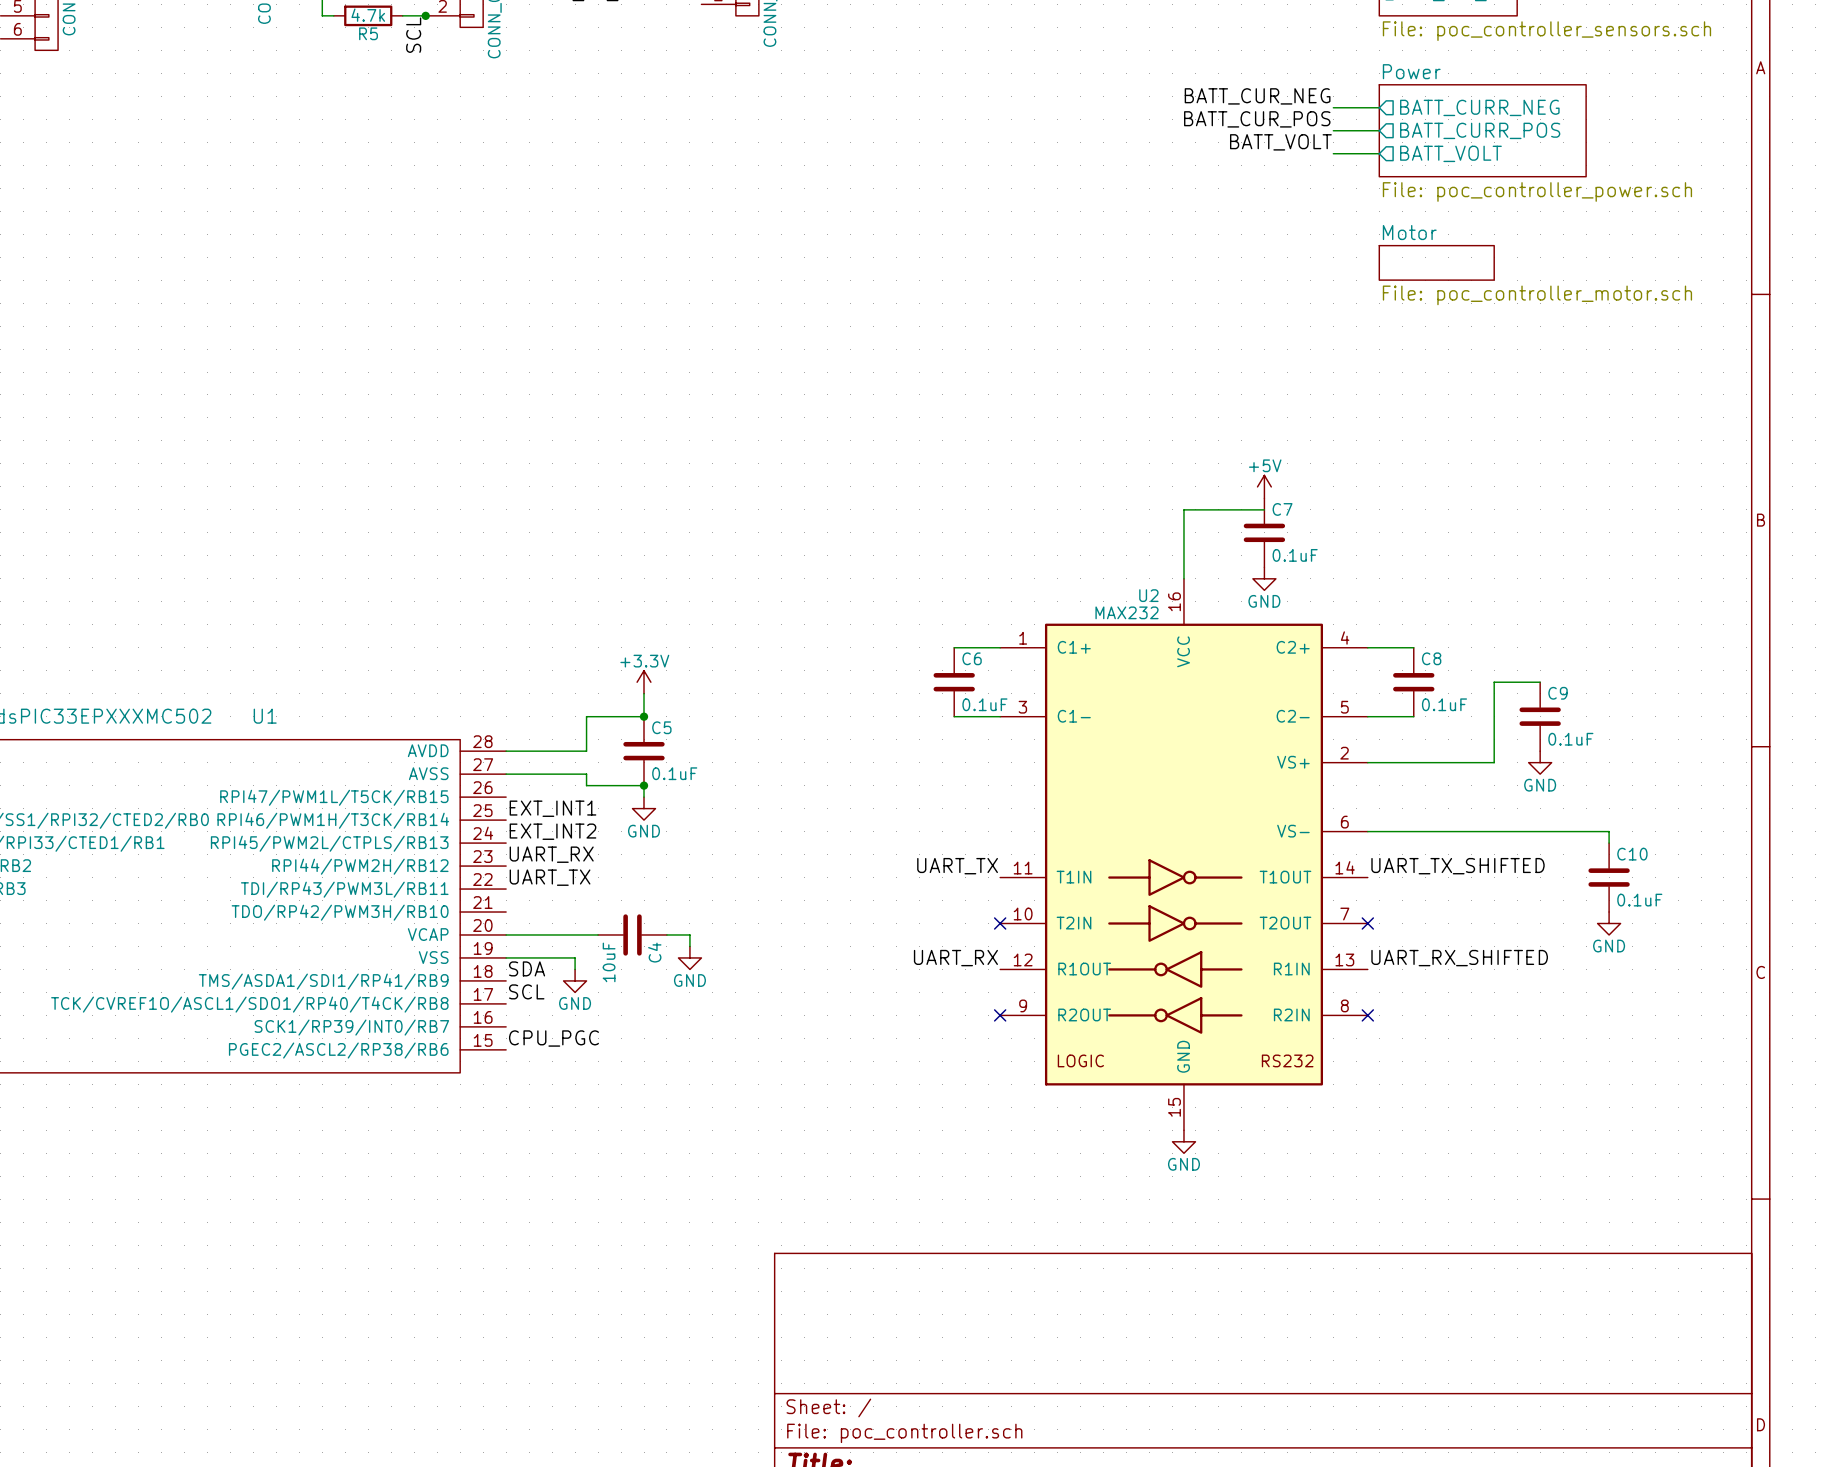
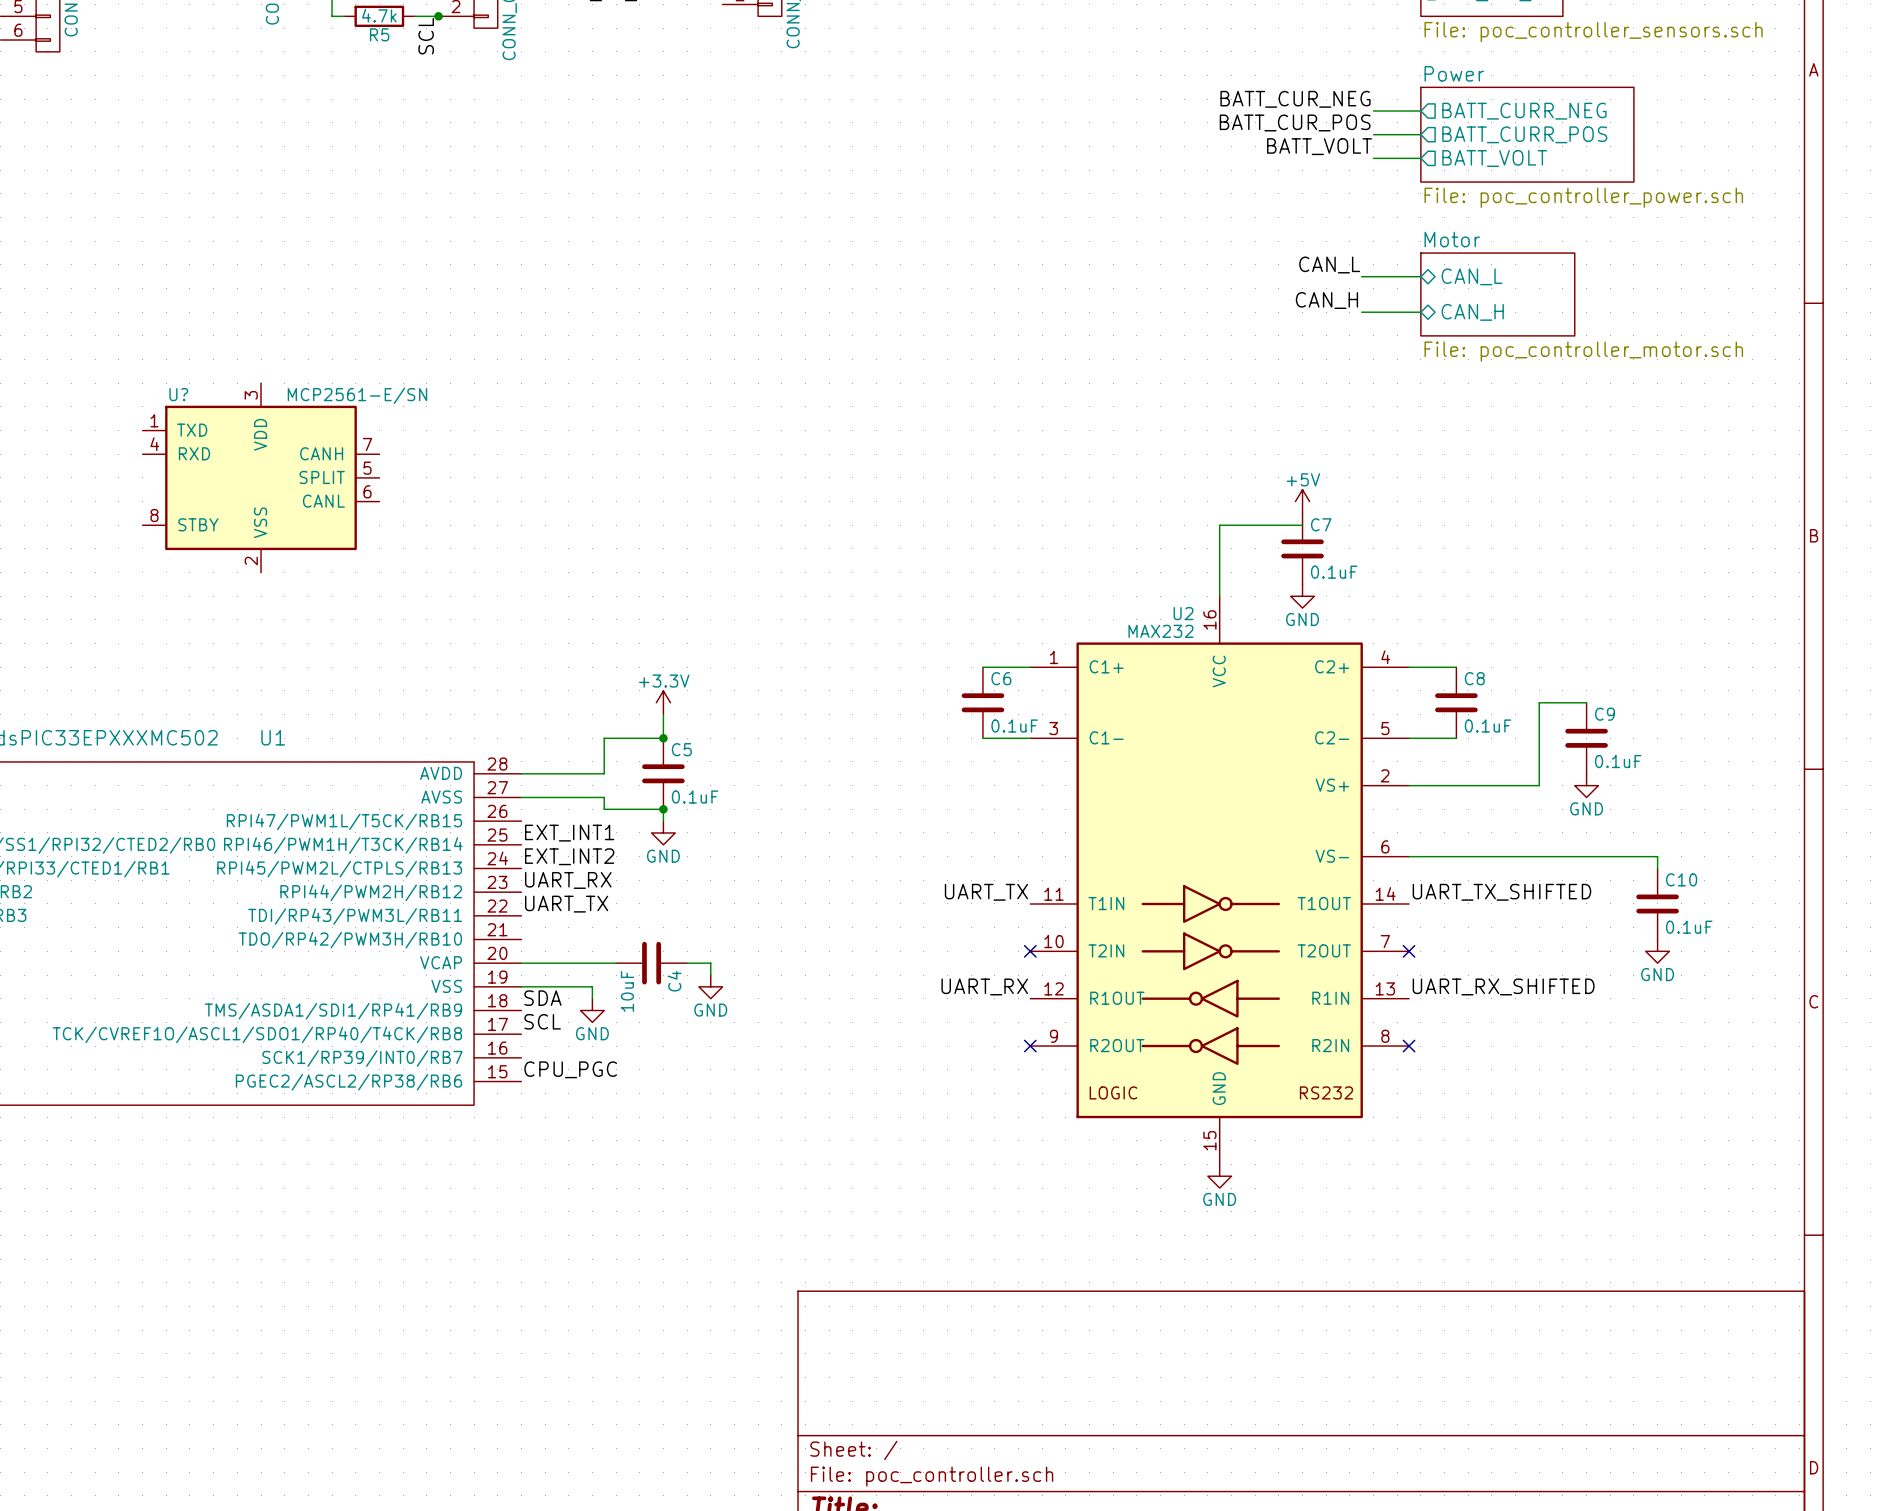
label: none -> CAN_L (1329, 265)
sheet Motor: File: poc_controller_motor.sch (1436, 262) -> none
wire: none -> (1361, 276) (1420, 276)
sheet pin: none -> CAN_L (1472, 276)
sheet Motor: none -> File: poc_controller_motor.sch (1497, 294)
label: none -> CAN_H (1326, 300)
wire: none -> (1361, 312) (1420, 312)
sheet pin: none -> CAN_H (1472, 312)
U?: none -> MCP2561-E/SN (261, 477)

